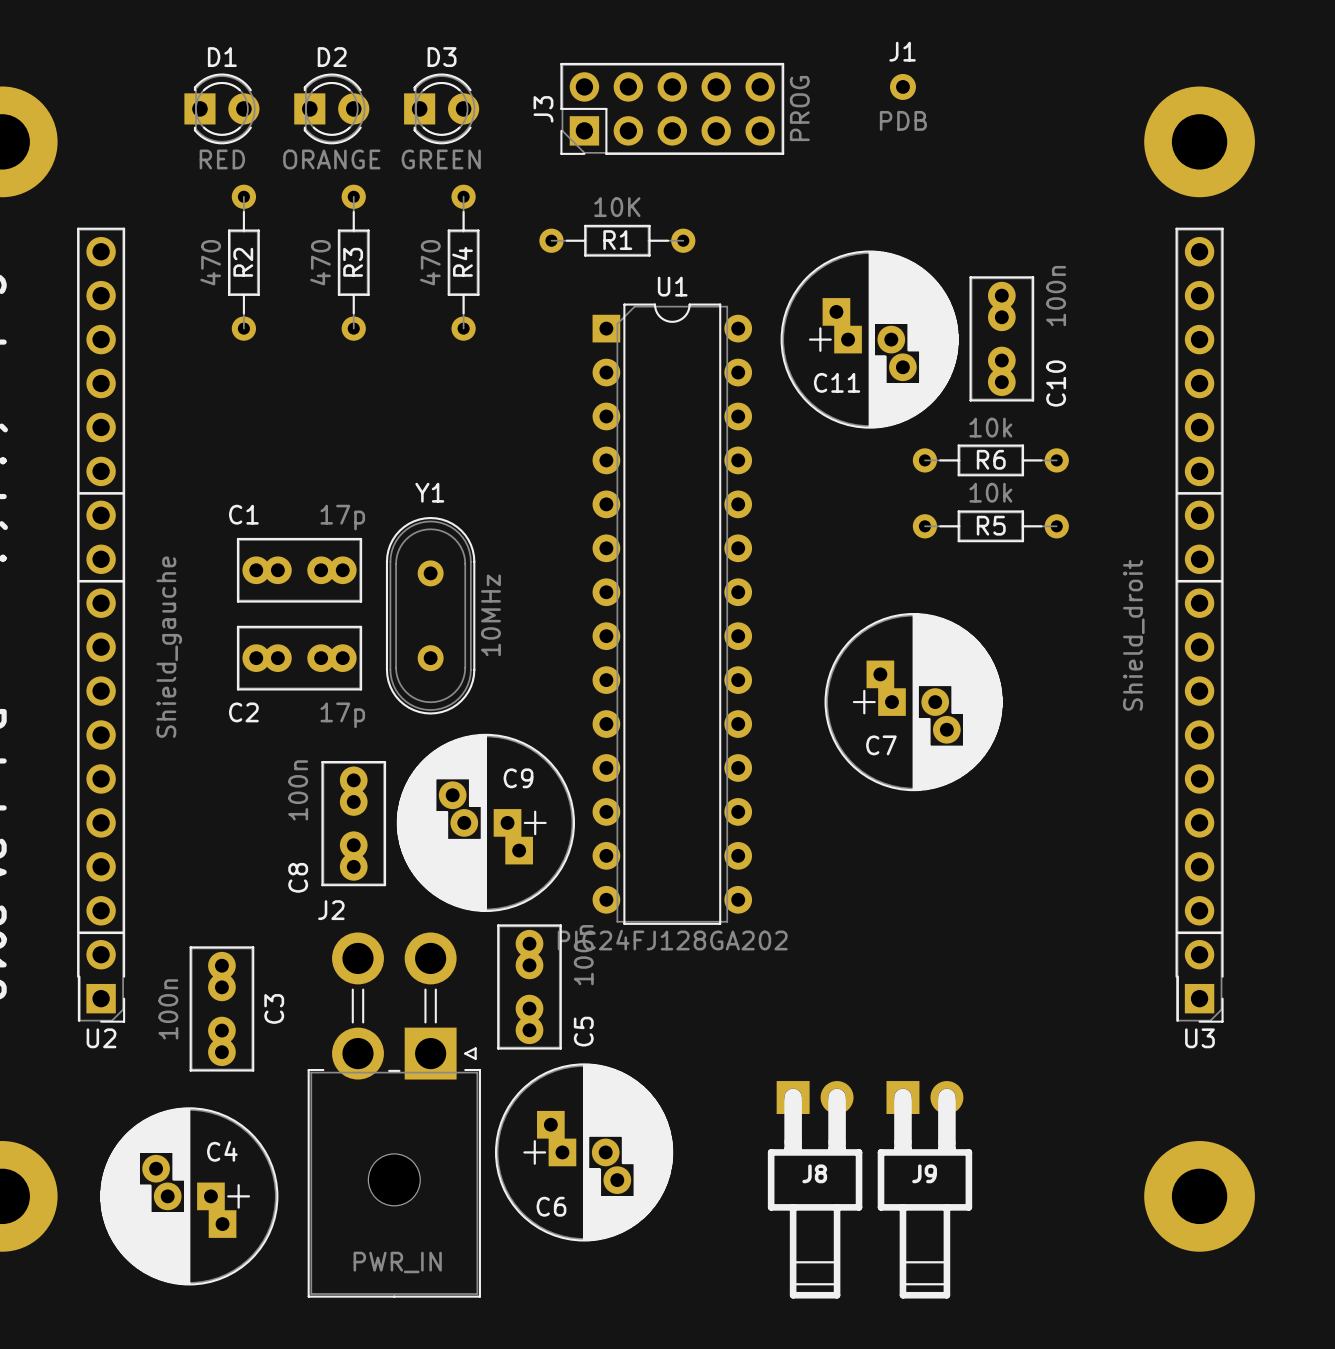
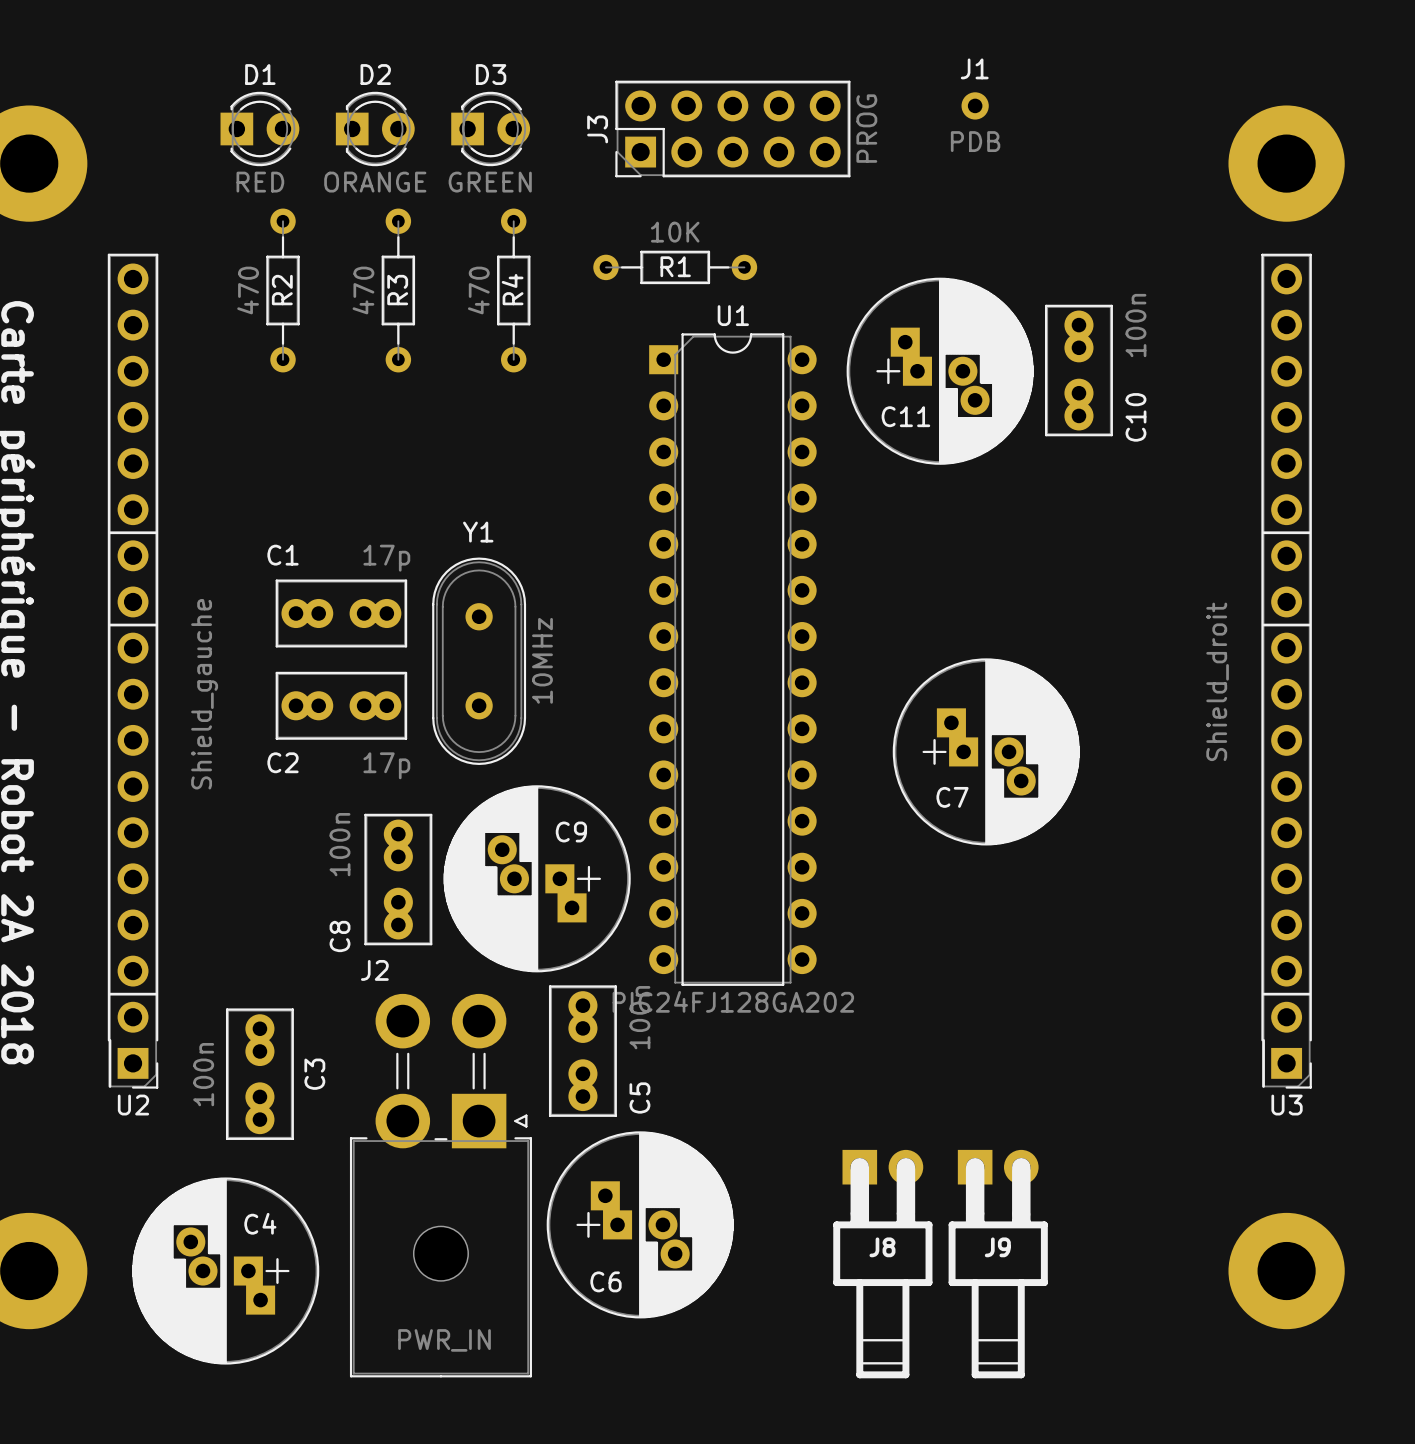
R6: 10k (990, 460) -> none
R5: 10k (990, 526) -> none

